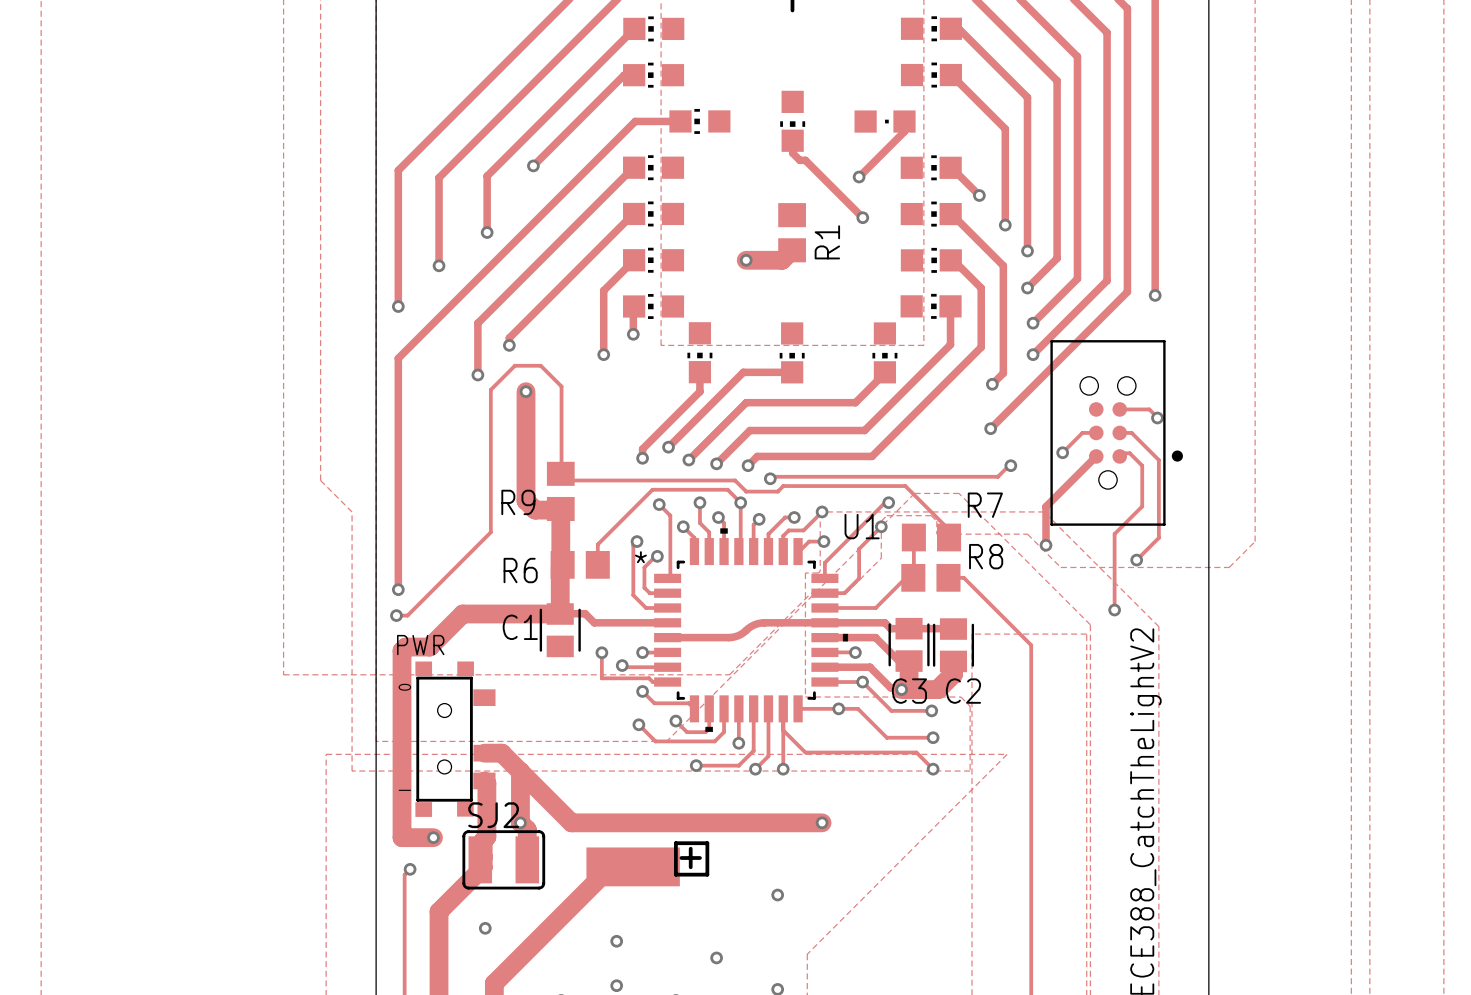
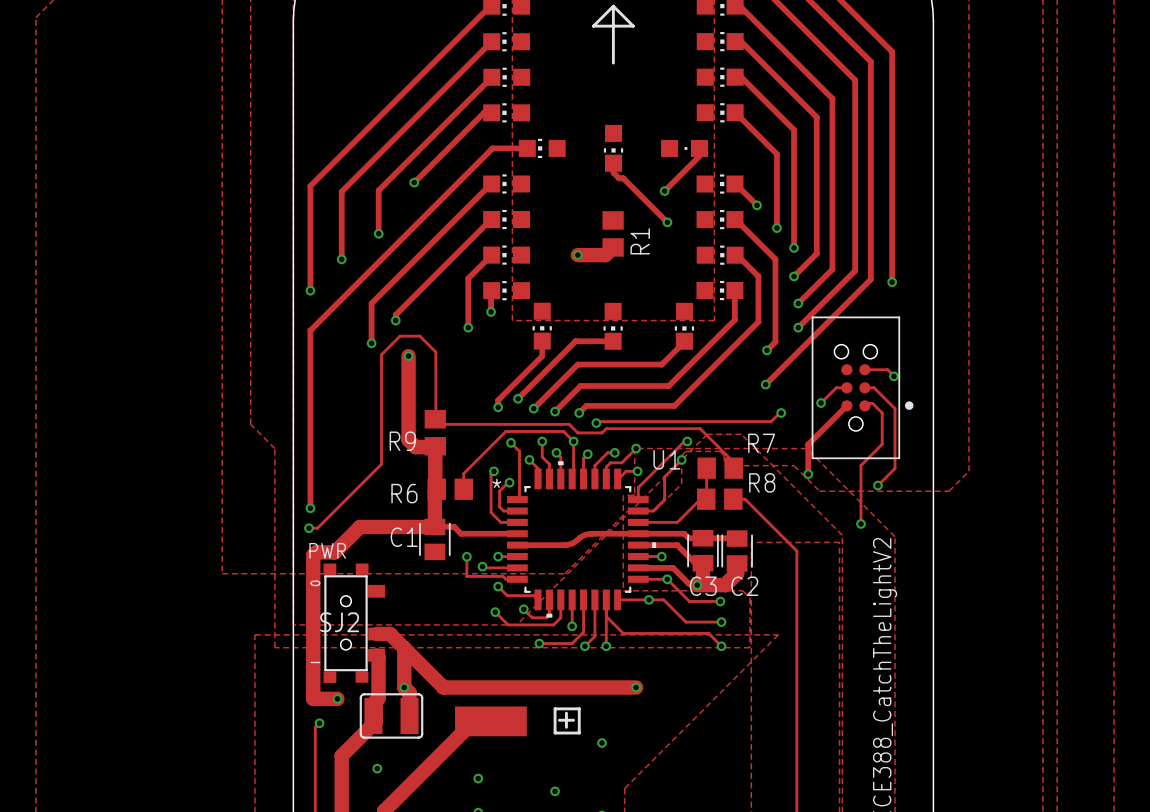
SJ2 name position: SJ2 (493, 815) -> SJ2 (339, 622)
line: (675, 843) (675, 874) (707, 874) (707, 843) (675, 843) -> (555, 708) (555, 733) (579, 733) (579, 708) (555, 708)
line: (690, 848) (690, 867) -> (566, 713) (566, 727)
line: (681, 858) (699, 858) -> (559, 720) (573, 720)

